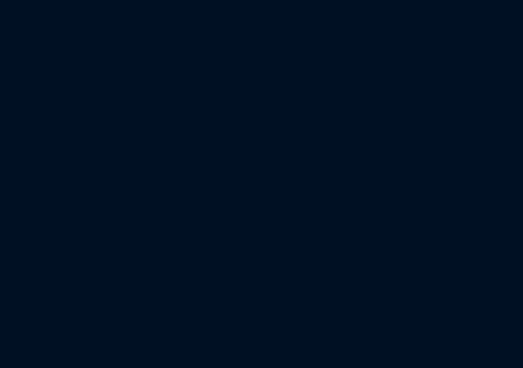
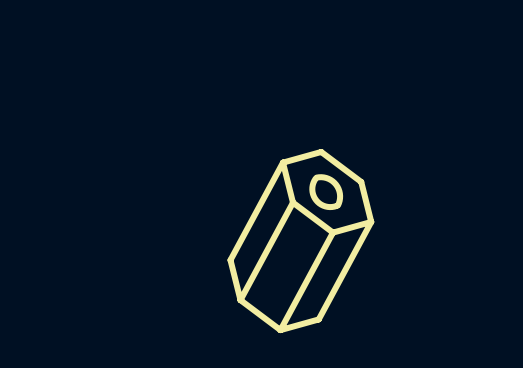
drawing: none -> [227, 148, 375, 334]

